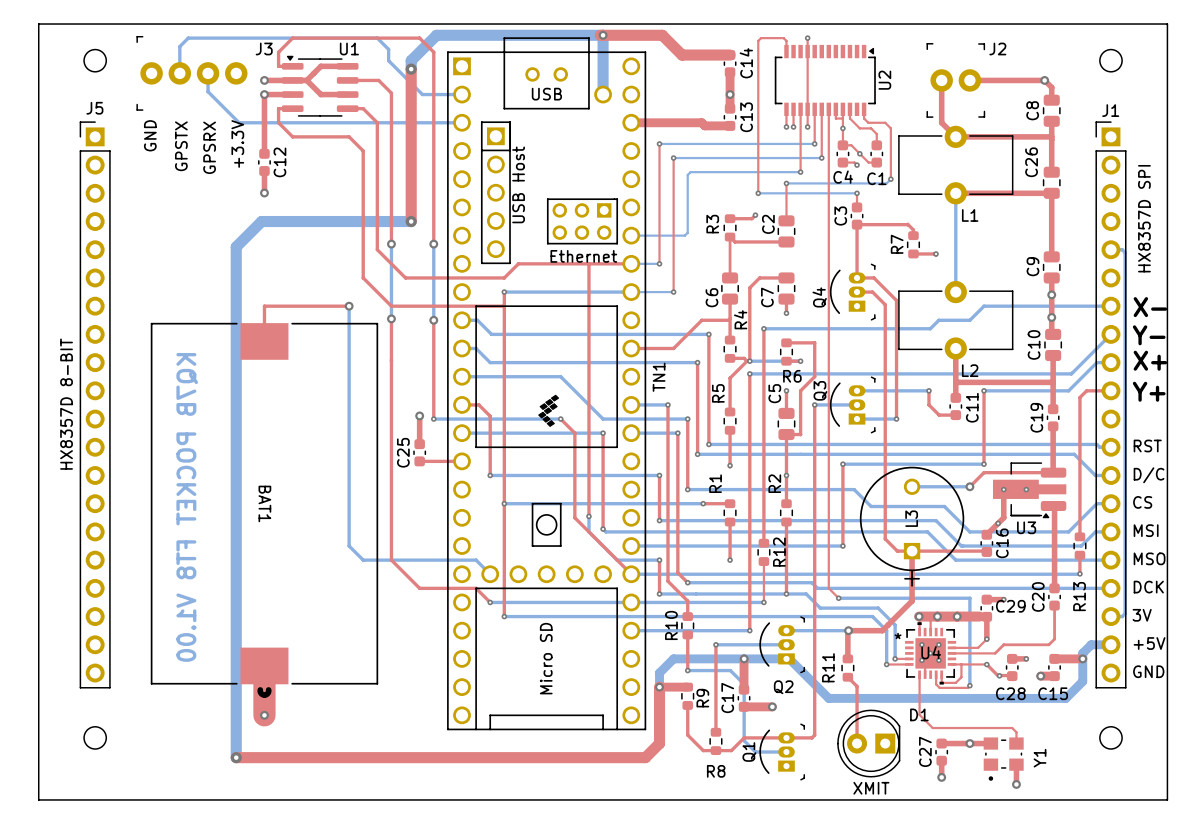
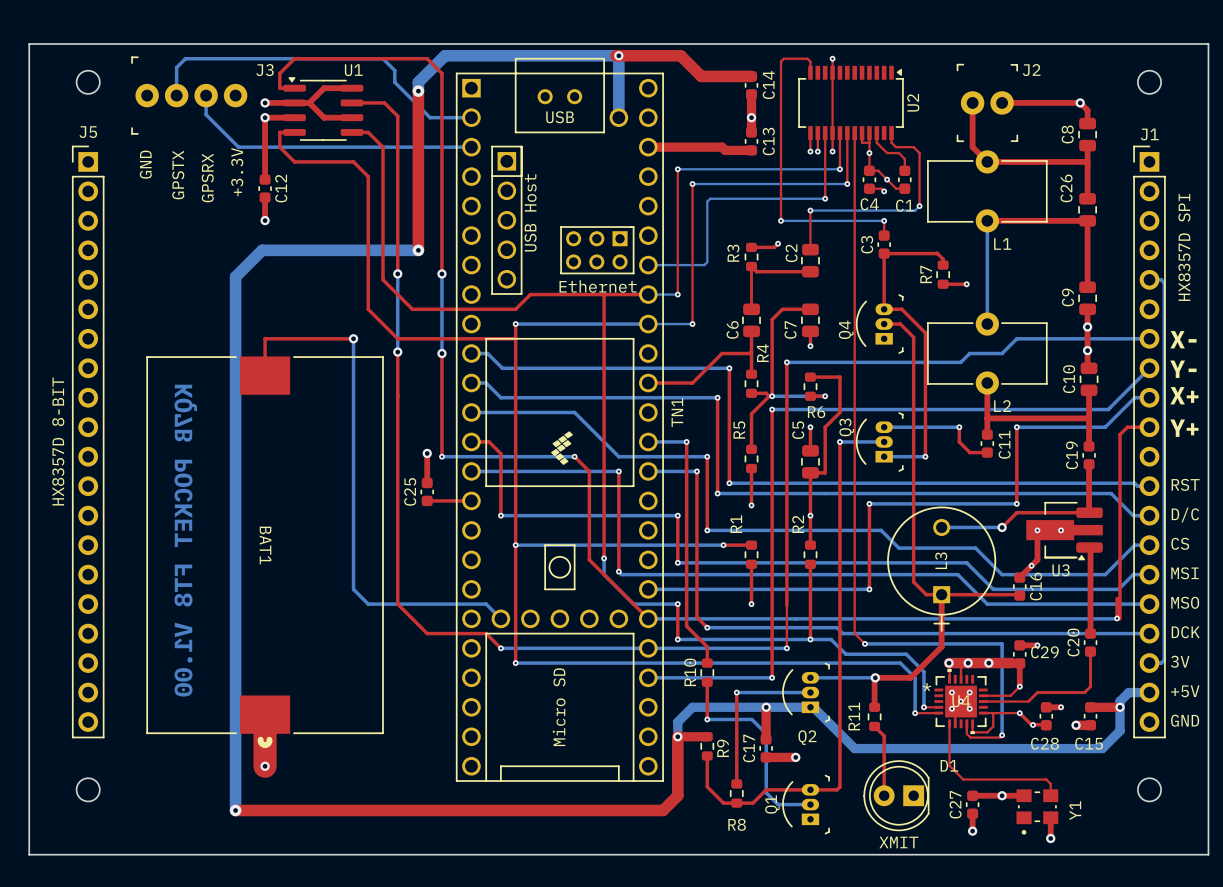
top track: (1089, 390) (1086, 390) (1079, 397) (1079, 536) -> (1127, 427) (1120, 434) (1120, 618)
top track: none -> (786, 586) (786, 605)
R13: (1079, 546) -> none
R12: (763, 552) -> none

